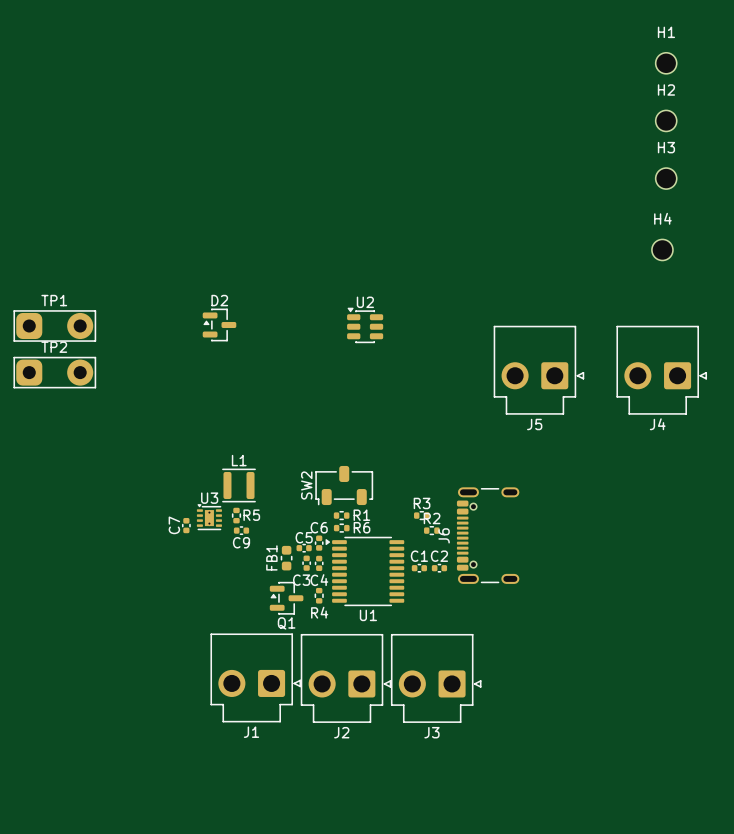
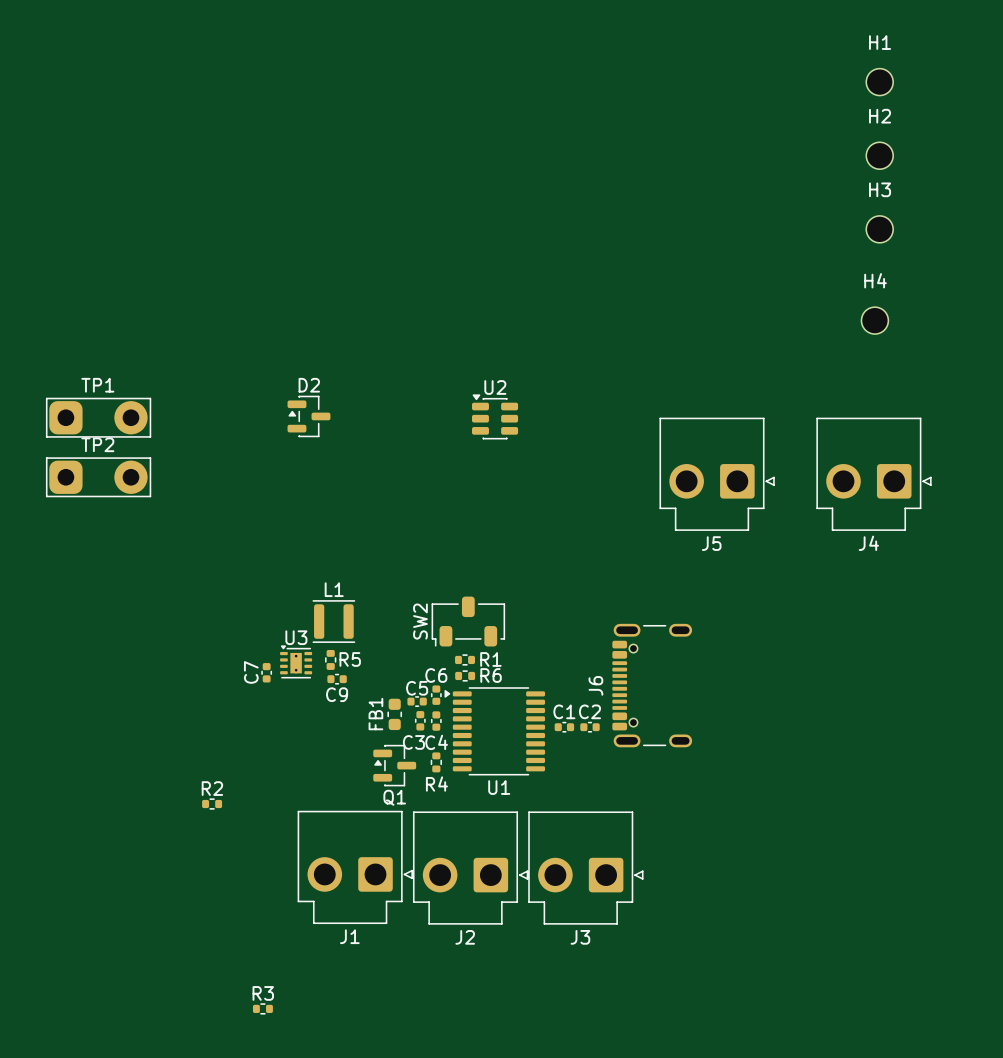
R3 position: (421, 515) -> (262, 1008)
R2 position: (431, 530) -> (212, 804)

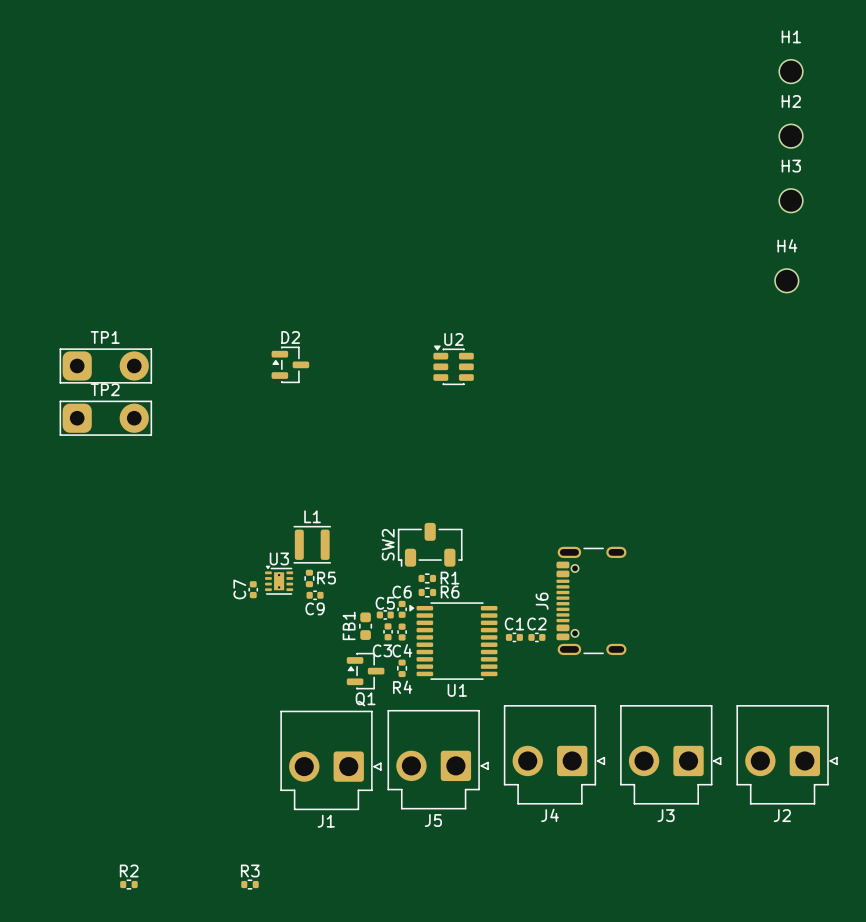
J5 position: (717, 474) -> (438, 759)
J4 position: (873, 474) -> (554, 754)
R2 position: (212, 804) -> (128, 884)
J2 position: (470, 868) -> (787, 754)
J3 position: (585, 868) -> (670, 754)

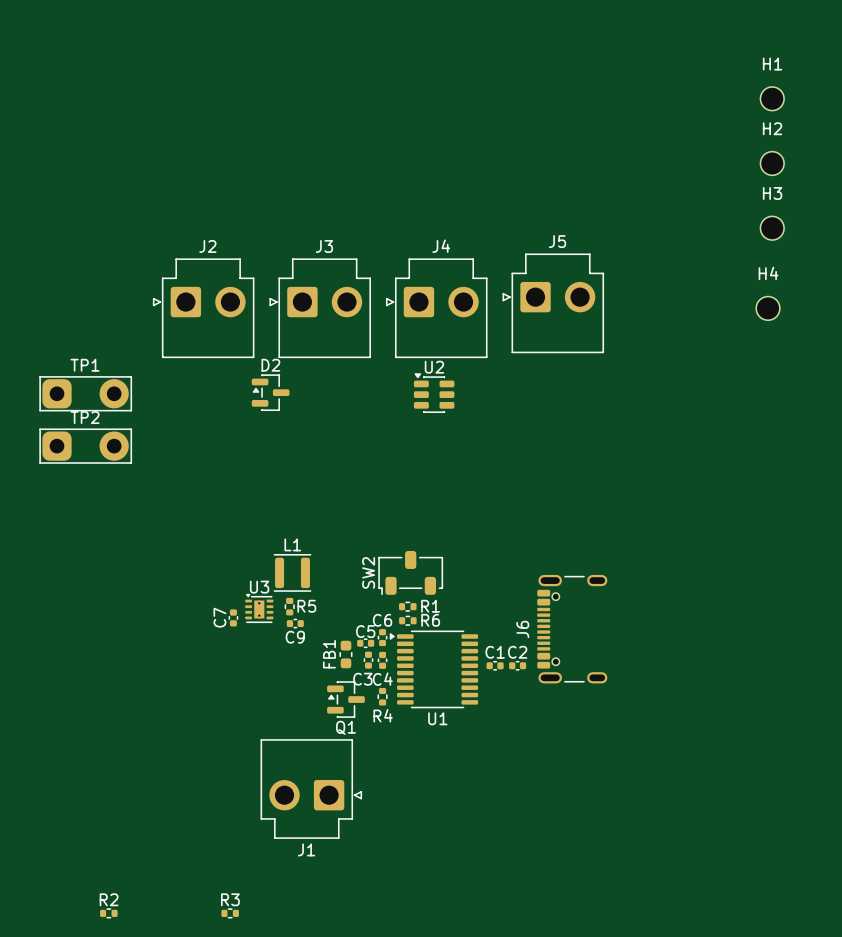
J4 rotation: 0° (554, 754) -> 180° (436, 308)
J4 position: (554, 754) -> (436, 308)
J3 rotation: 0° (670, 754) -> 180° (320, 308)
J3 position: (670, 754) -> (320, 308)
J2 rotation: 0° (787, 754) -> 180° (203, 308)
J2 position: (787, 754) -> (203, 308)
J5 rotation: 0° (438, 759) -> 180° (553, 303)
J5 position: (438, 759) -> (553, 303)

